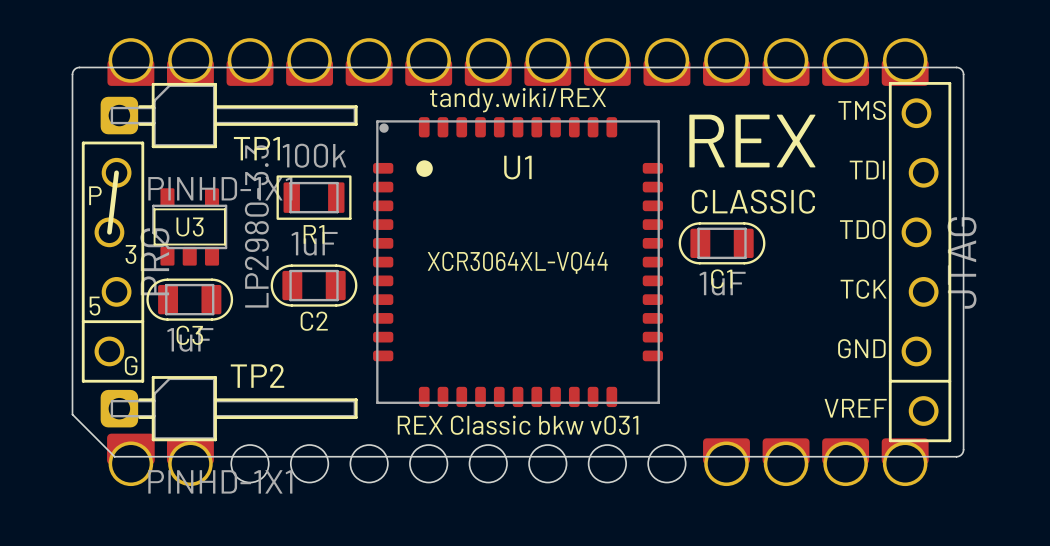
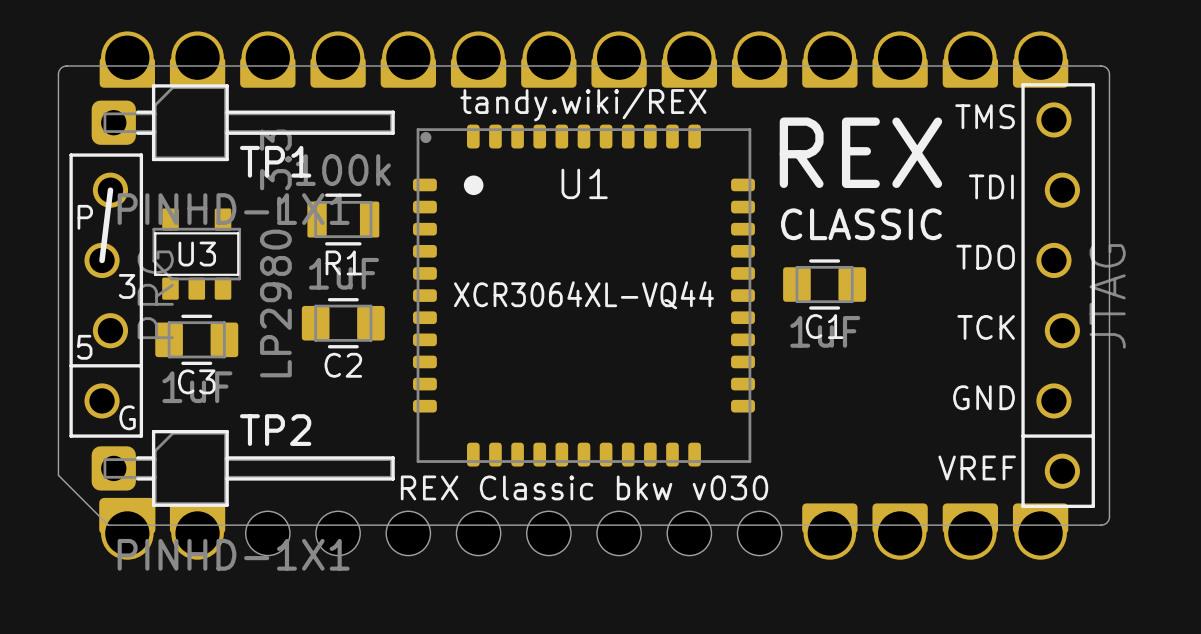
R1 footprint: [276, 175, 352, 220] -> [307, 193, 380, 246]
C1 footprint: [678, 222, 766, 265] -> [783, 259, 867, 310]
C2 footprint: [270, 264, 358, 307] -> [301, 298, 385, 349]
C3 footprint: [146, 278, 234, 321] -> [155, 314, 239, 365]
text: REX Classic bkw v031 (518, 425) -> REX Classic bkw v030 (584, 487)

